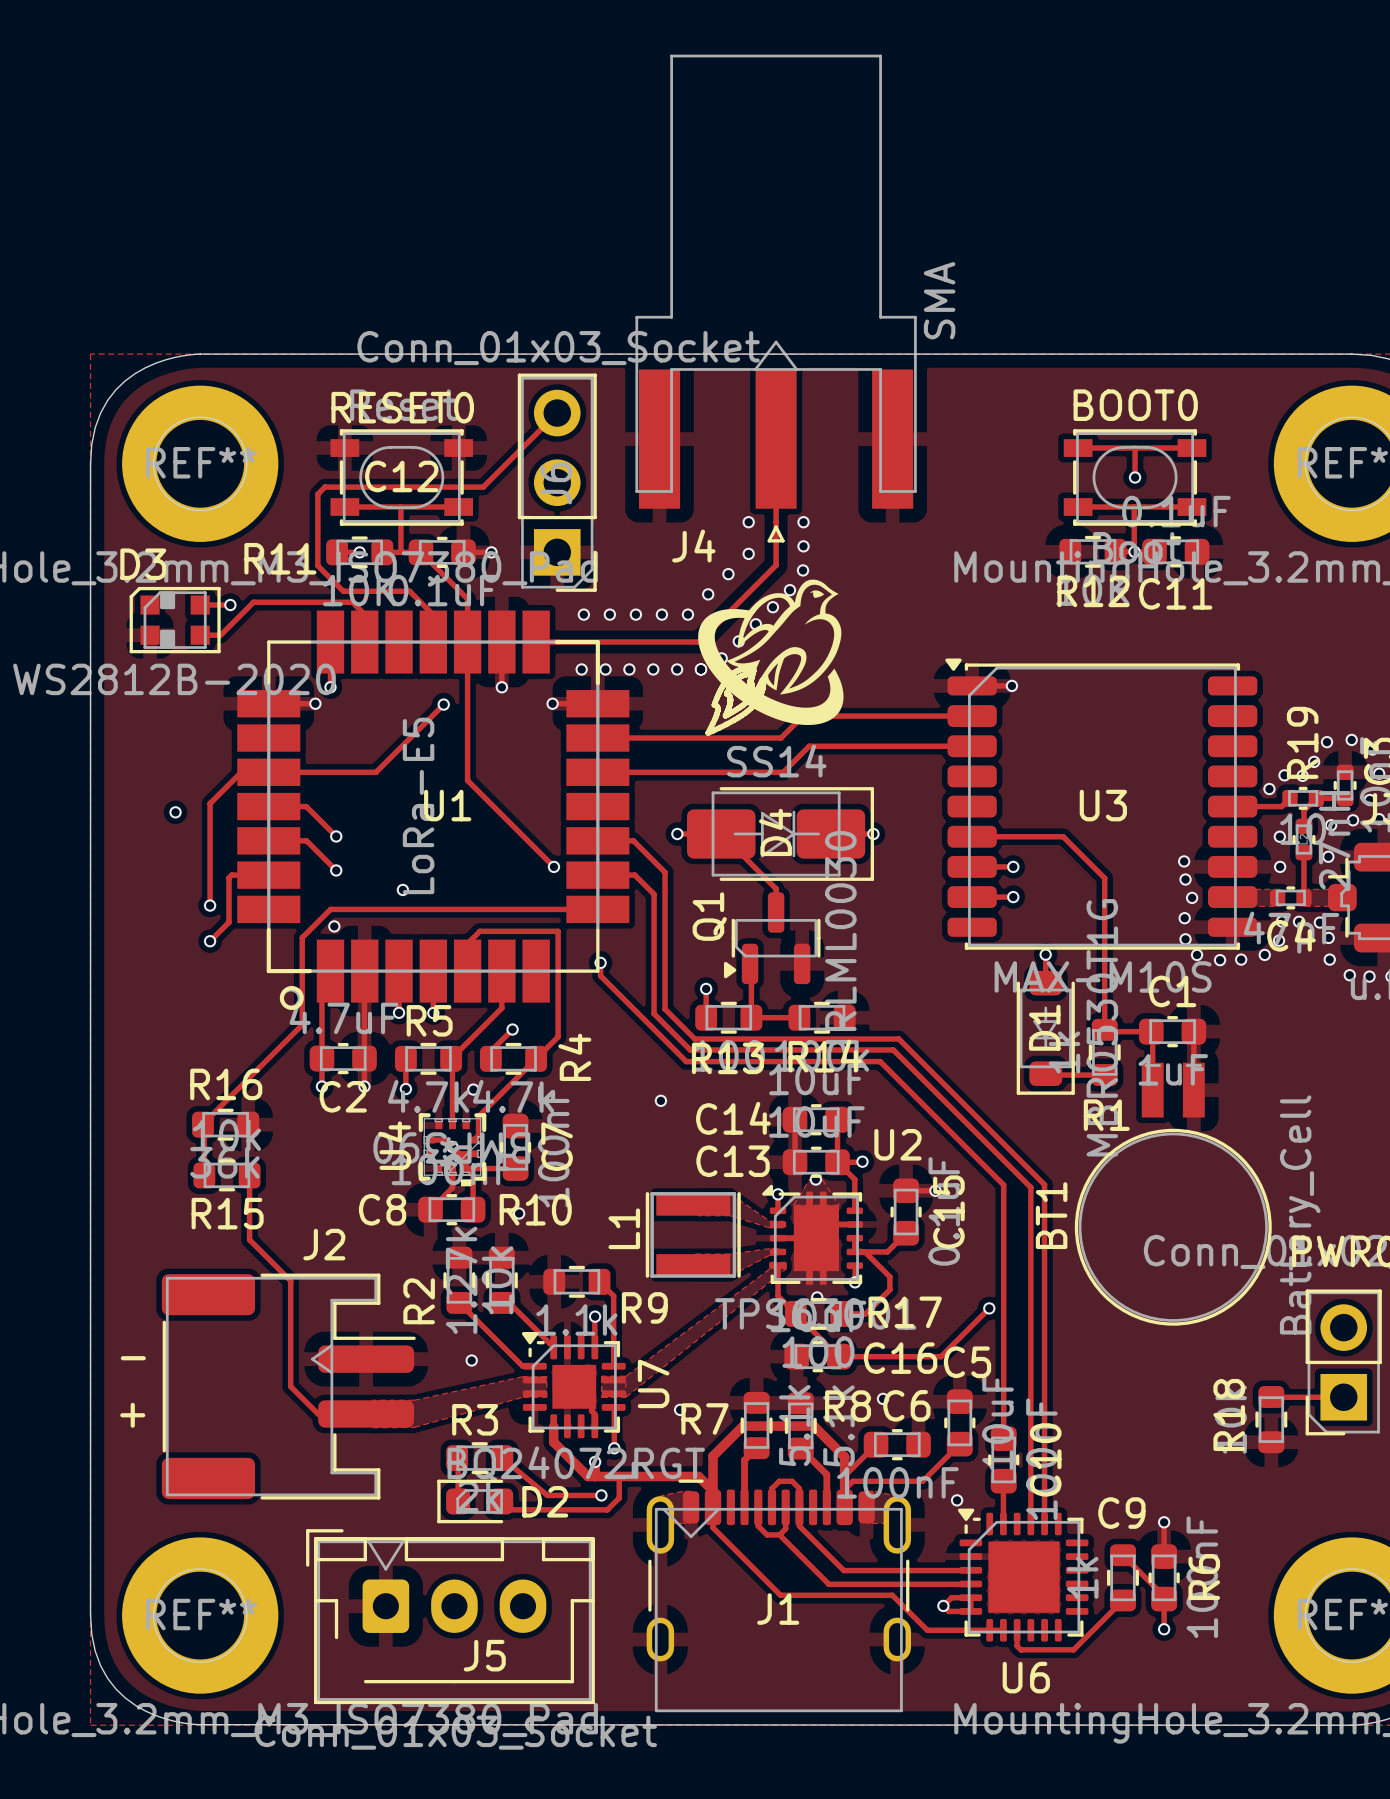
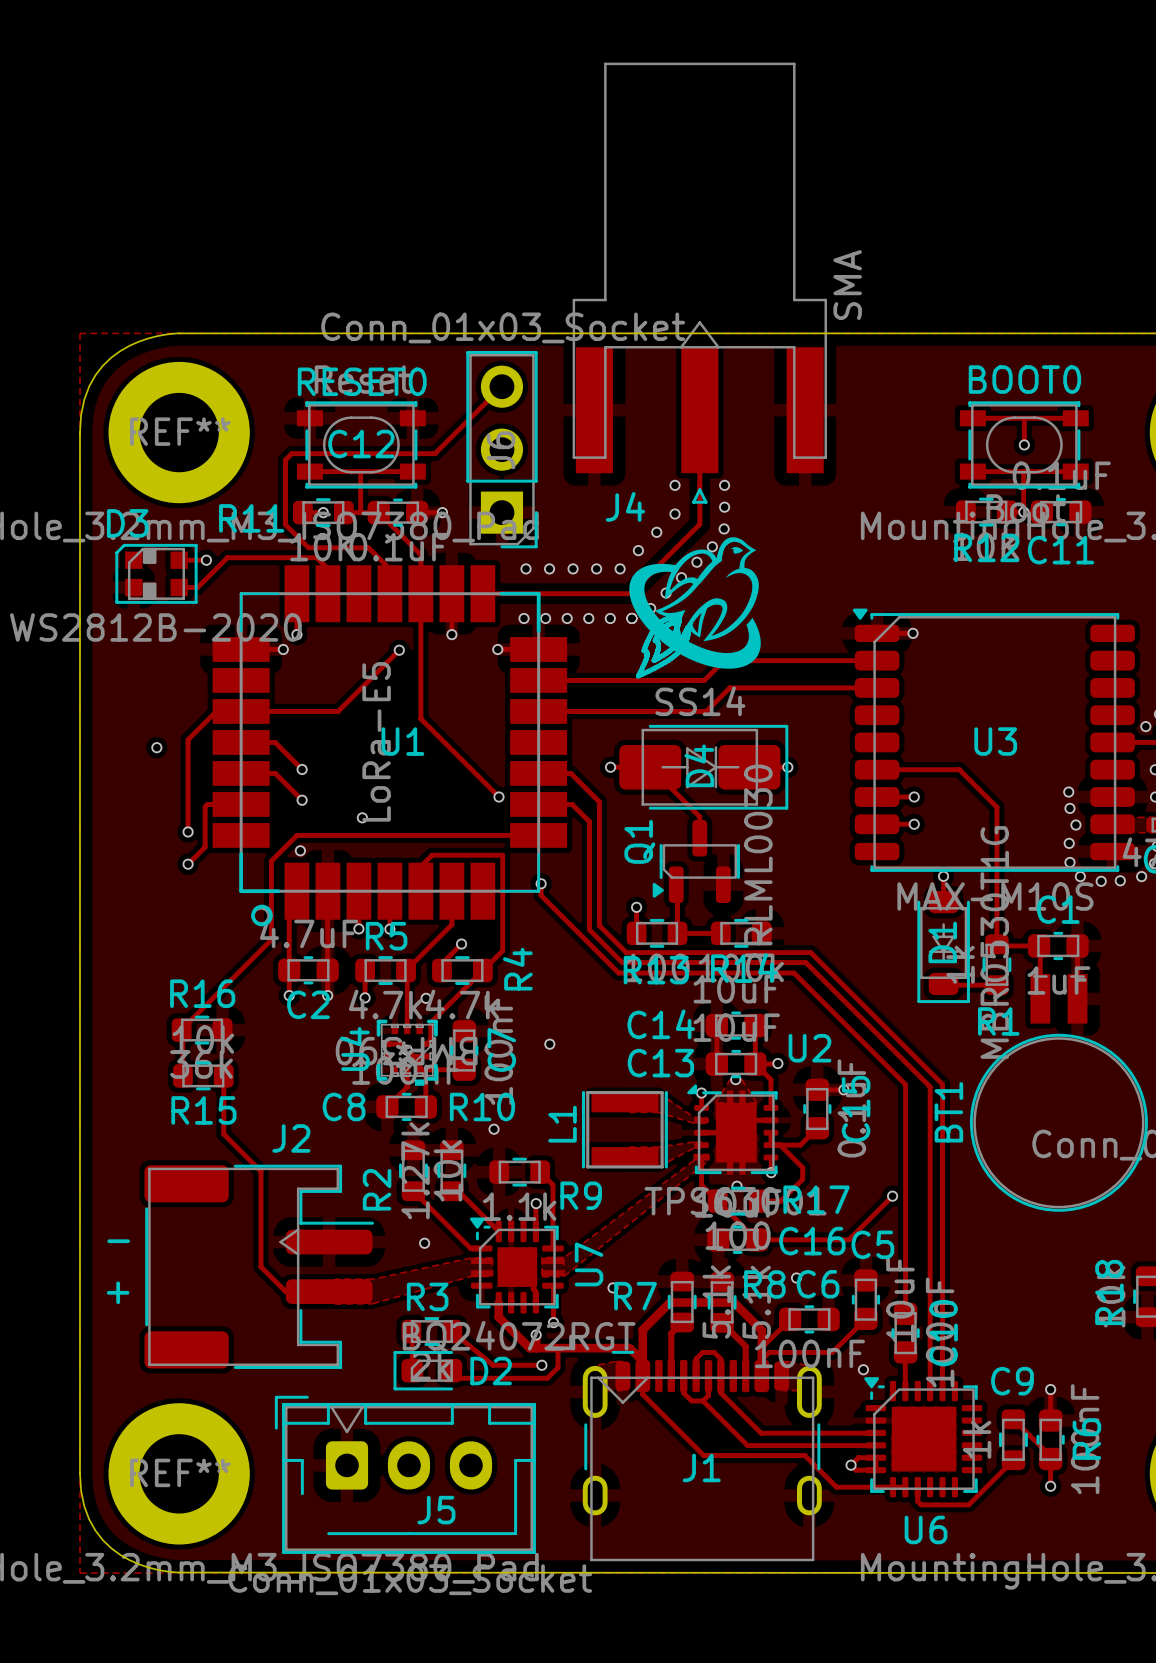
via: (660, 1100) -> none
via: none -> (549, 1044)
via position: (519, 1213) -> (494, 1129)

